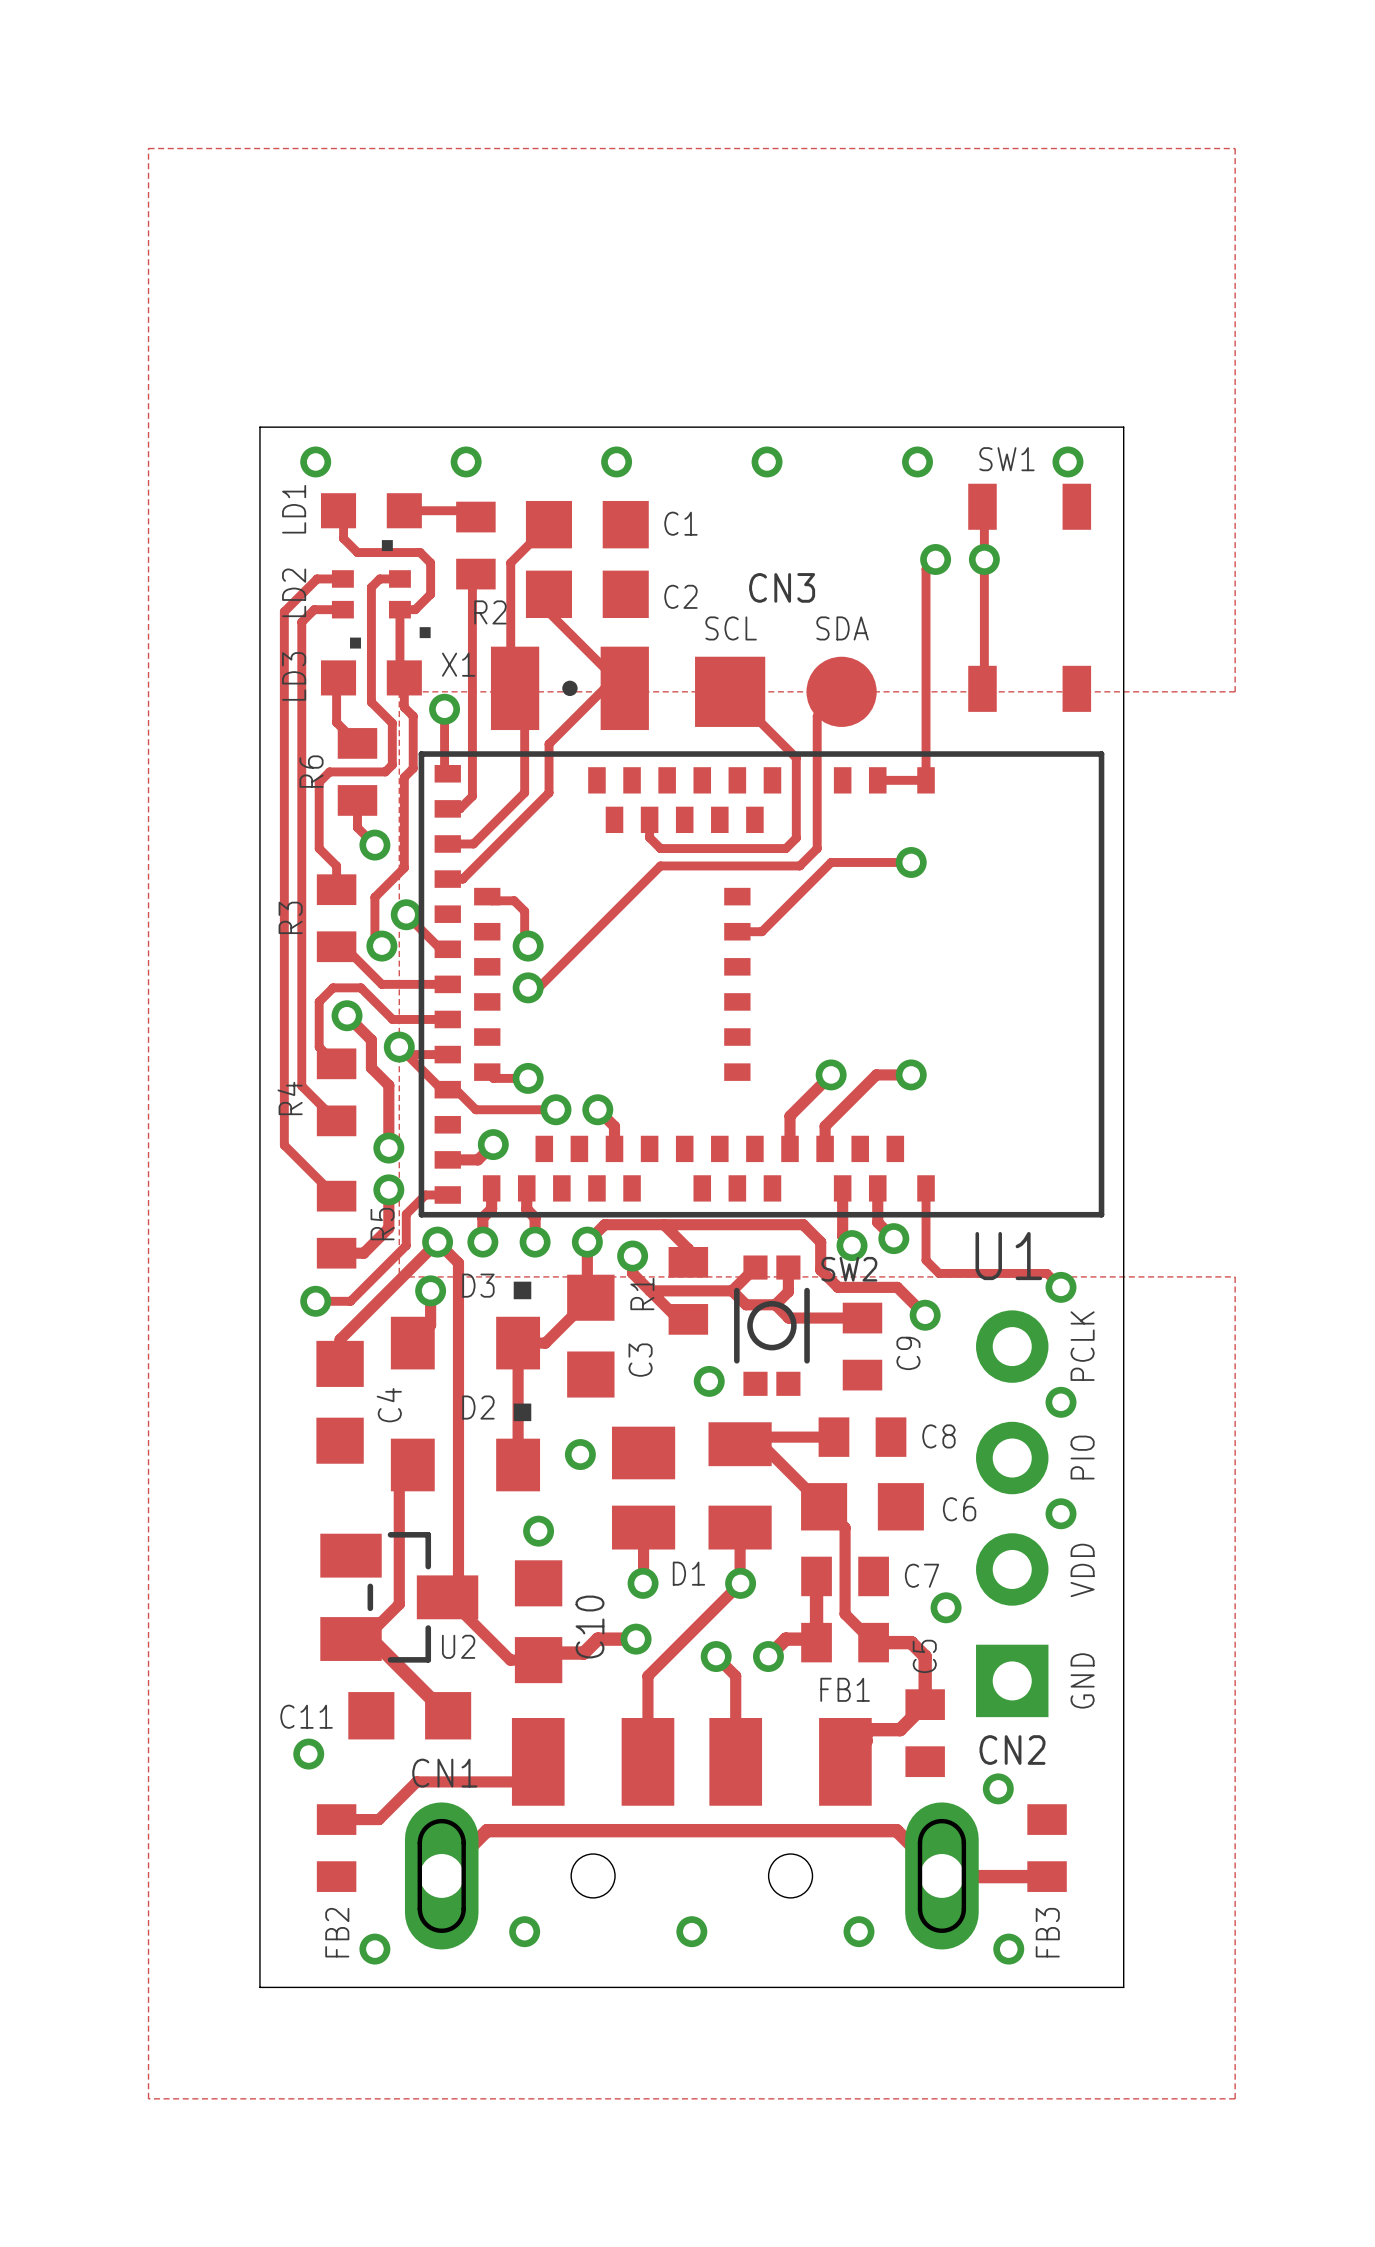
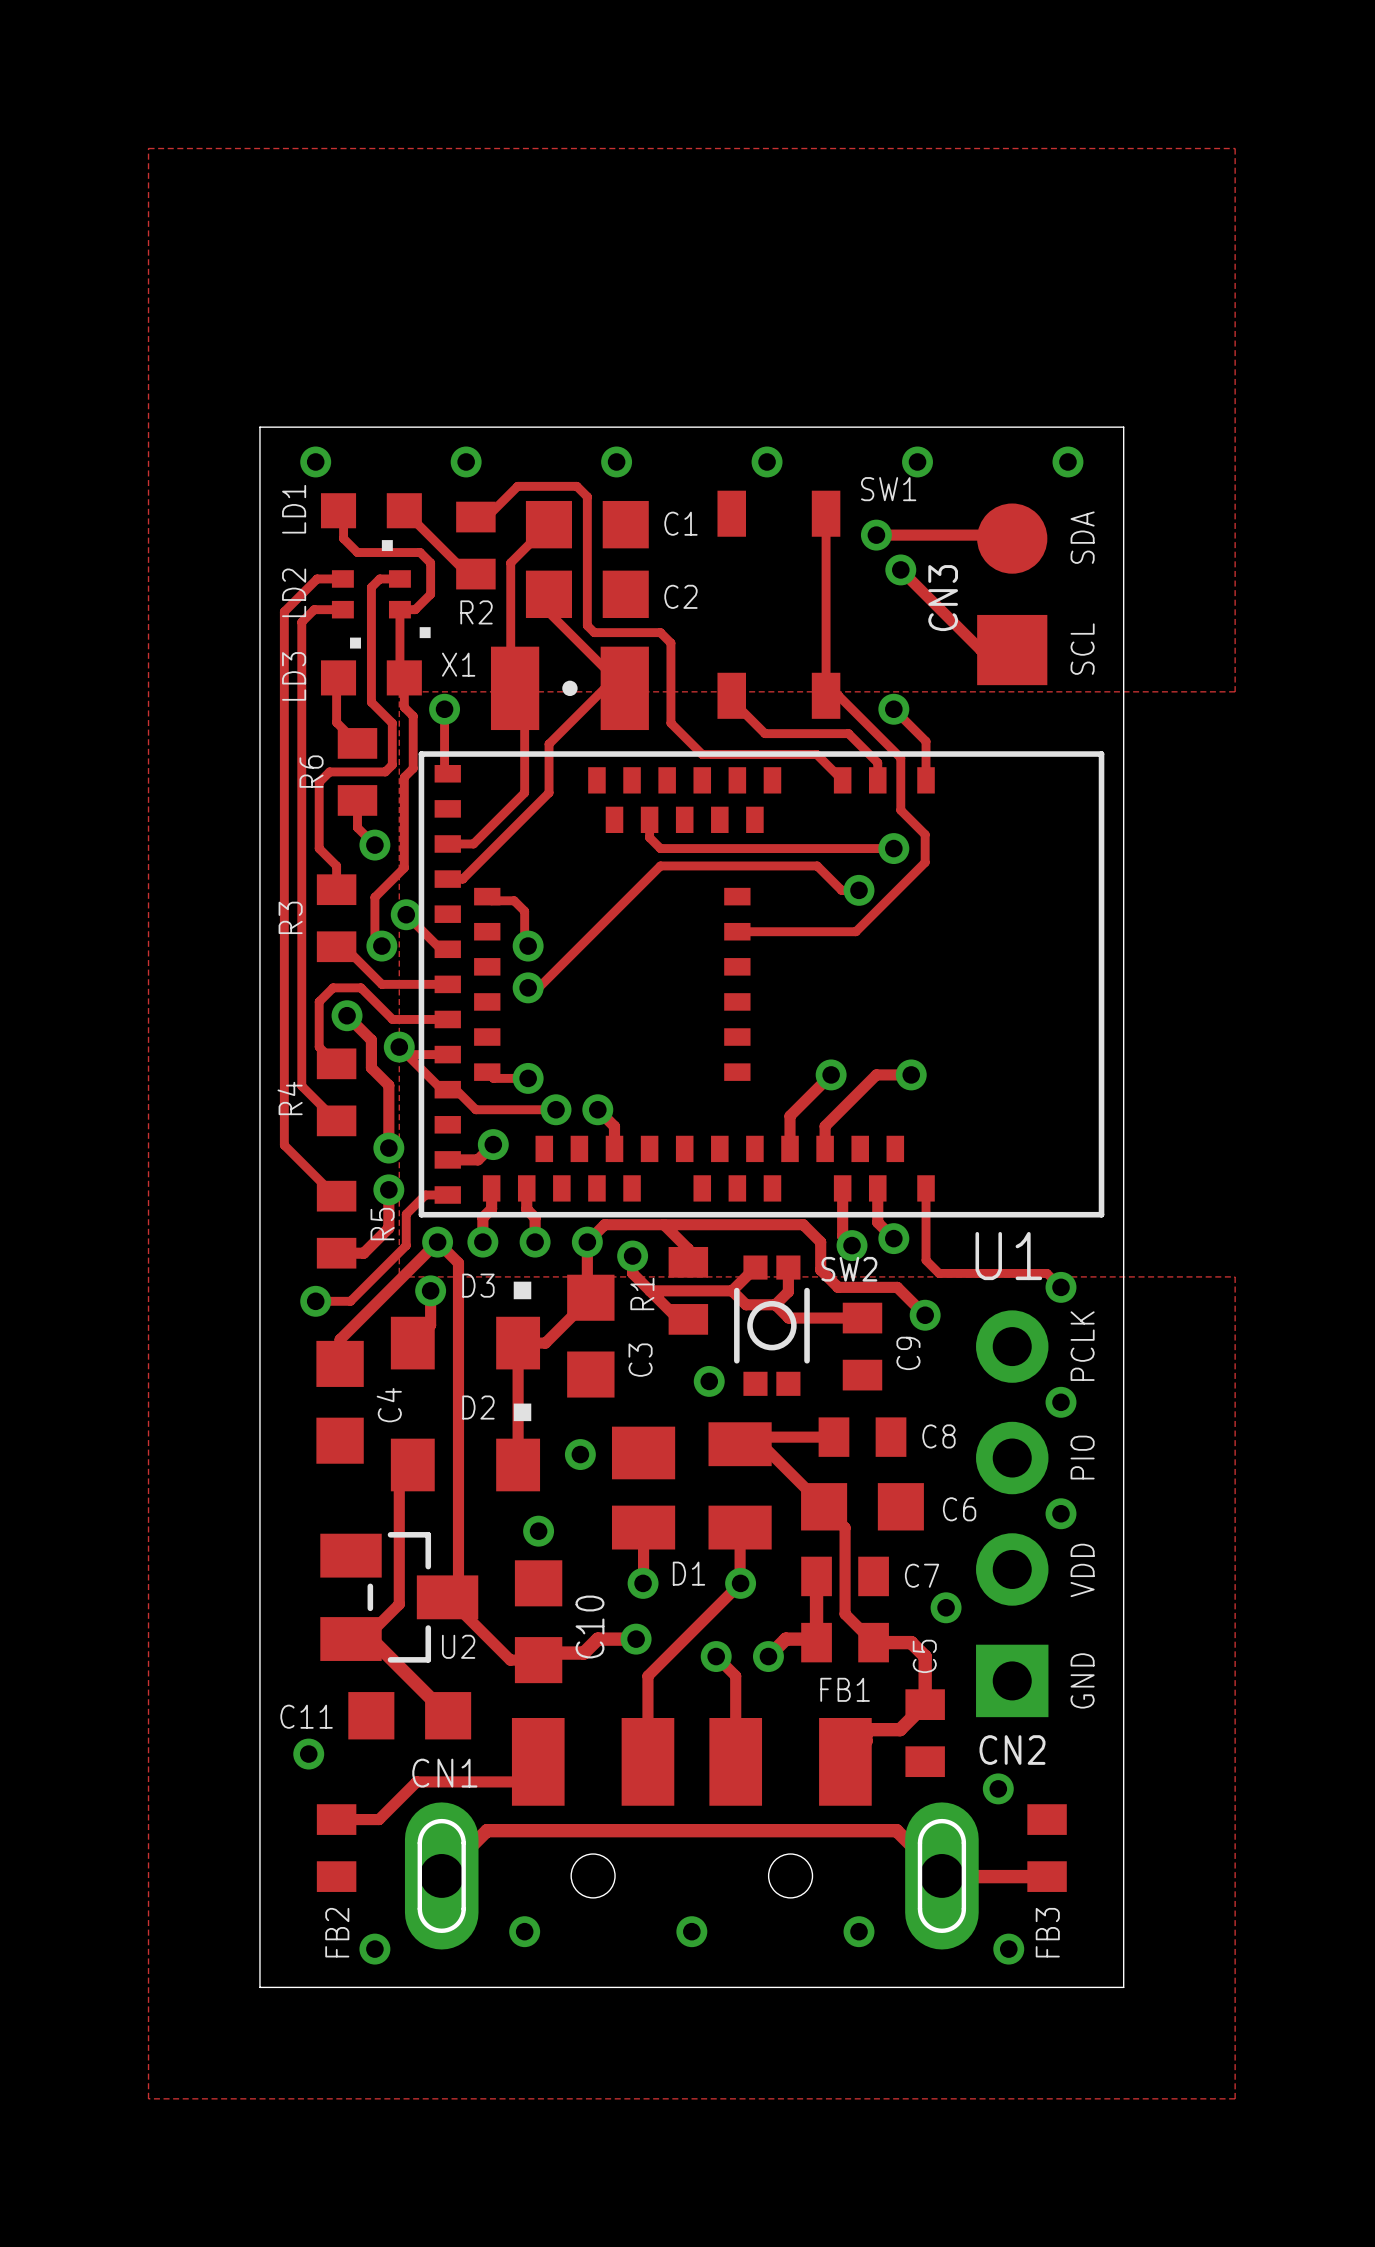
SW1 name position: SW1 (1006, 459) -> SW1 (888, 489)
track: (982, 506) (984, 508) (984, 686) (982, 688) -> none
track: (404, 510) (469, 510) (475, 517) -> (404, 510) (467, 574) (475, 574)
track: none -> (475, 517) (487, 517) (517, 486) (576, 486) (587, 496) (587, 625) (594, 632) (660, 632) (670, 643) (670, 723) (702, 754) (816, 754) (842, 780) (841, 781)
track: none -> (876, 535) (1008, 535) (1012, 538)
via: none -> (876, 535)
track: (935, 559) (926, 569) (926, 741) -> (893, 709) (926, 741)
via: (935, 559) -> none
via: (984, 559) -> none
track: none -> (900, 569) (980, 650) (1012, 650)
via: none -> (900, 569)
track: (475, 574) (472, 577) (472, 796) (459, 808) (447, 808) -> none
SW1 position: (1029, 597) -> (778, 604)
R2 name position: R2 (490, 612) -> R2 (476, 612)
text rotation: 0° (731, 628) -> 90° counterclockwise (1082, 649)
text position: SCL (731, 628) -> SCL (1082, 649)
text rotation: 0° (842, 628) -> 90° counterclockwise (1082, 537)
text position: SDA (842, 628) -> SDA (1082, 537)
track: (730, 691) (796, 758) (796, 838) (785, 848) -> (893, 848) (785, 848)
CN3 rotation: 0° (785, 691) -> 90° counterclockwise (1012, 594)
CN3 position: (785, 691) -> (1012, 594)
track: (841, 691) (817, 716) (817, 848) (799, 865) -> (859, 890) (841, 890) (817, 865) (799, 865)
via: none -> (893, 709)
track: (877, 780) (926, 780) -> (877, 780) (877, 762) (848, 733) (764, 733) (731, 700) (731, 695)
track: (911, 862) (831, 862) (761, 931) -> (826, 513) (826, 695) (838, 695) (900, 758) (900, 810) (925, 834) (925, 862) (855, 931) (761, 931)
via position: (911, 862) -> (893, 848)
via: none -> (859, 890)

